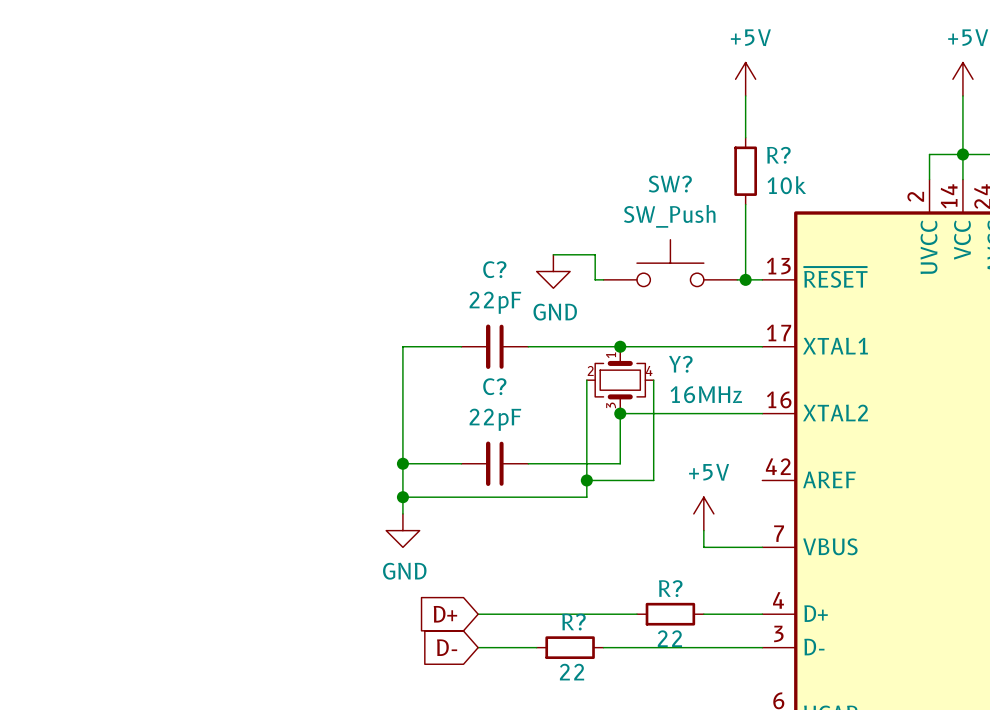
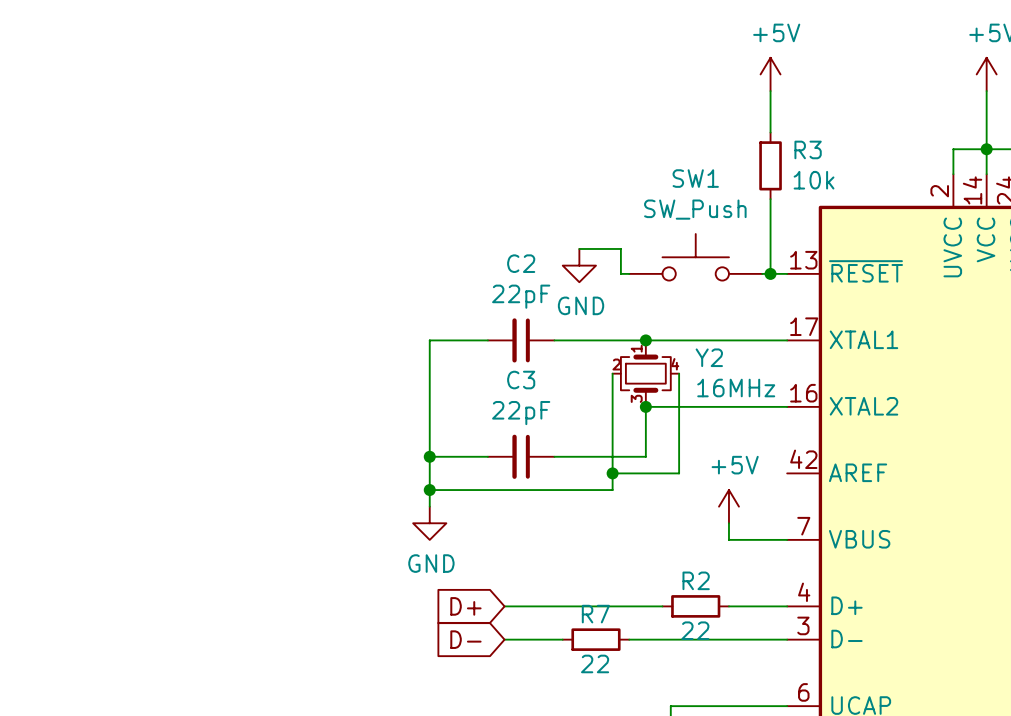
R? name: R? (778, 155) -> R3 (808, 149)
SW? name: SW? (670, 184) -> SW1 (695, 178)
C? name: C? (494, 269) -> C2 (521, 263)
Y? name: Y? (680, 364) -> Y2 (709, 357)
C? name: C? (494, 386) -> C3 (521, 380)
R? name: R? (670, 588) -> R2 (696, 580)
R? name: R? (573, 622) -> R7 (595, 614)

